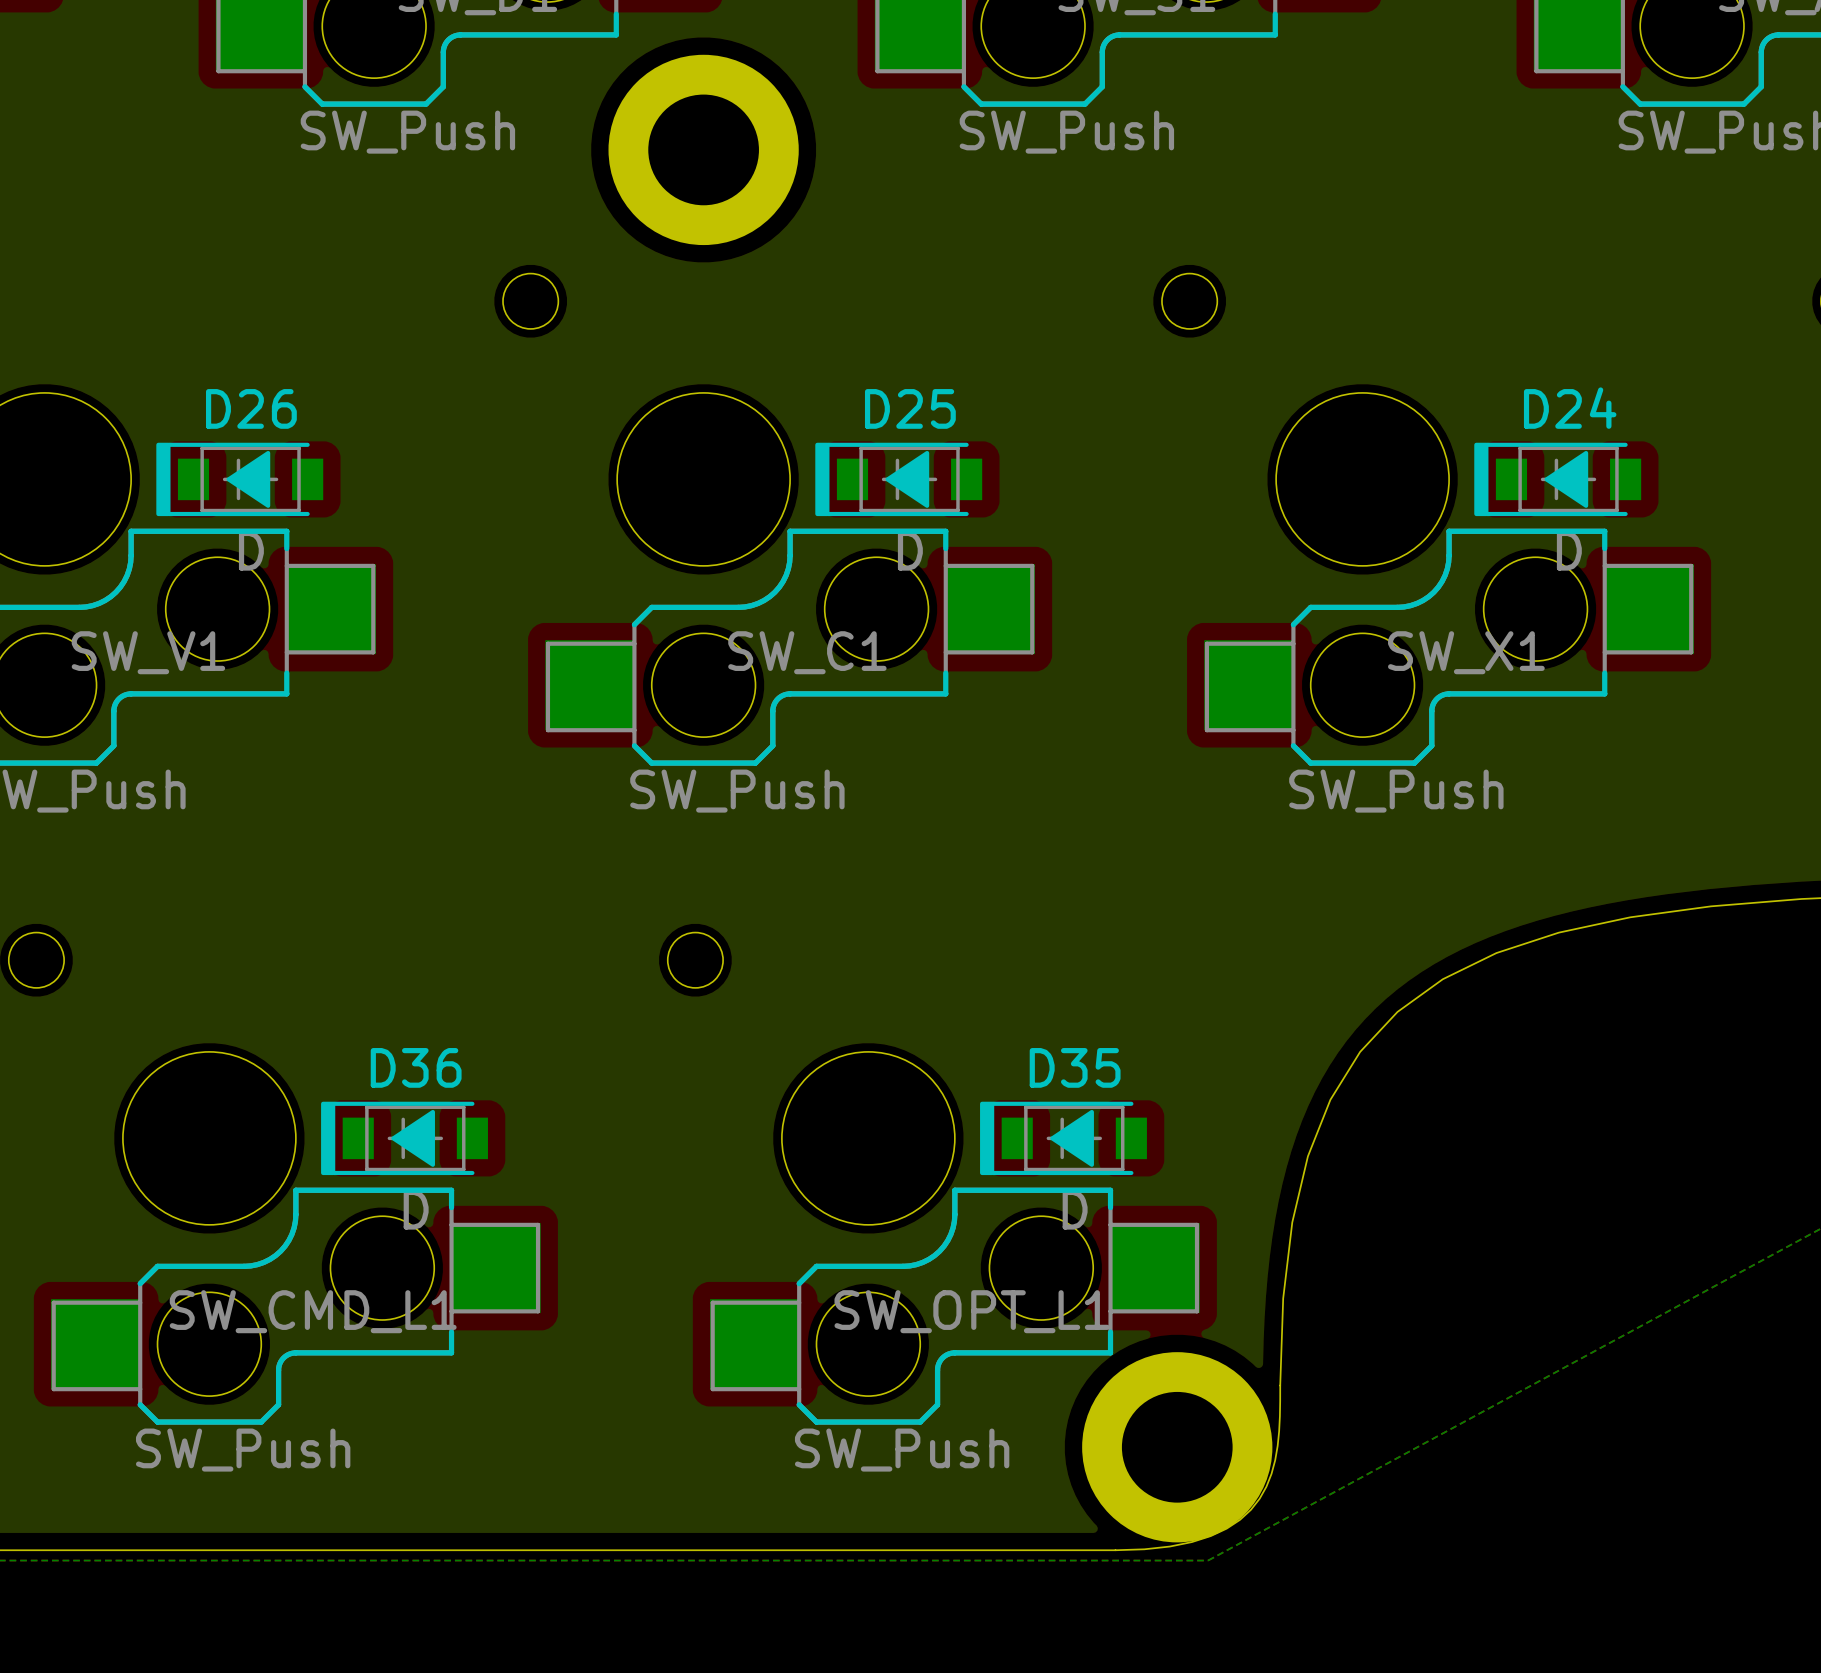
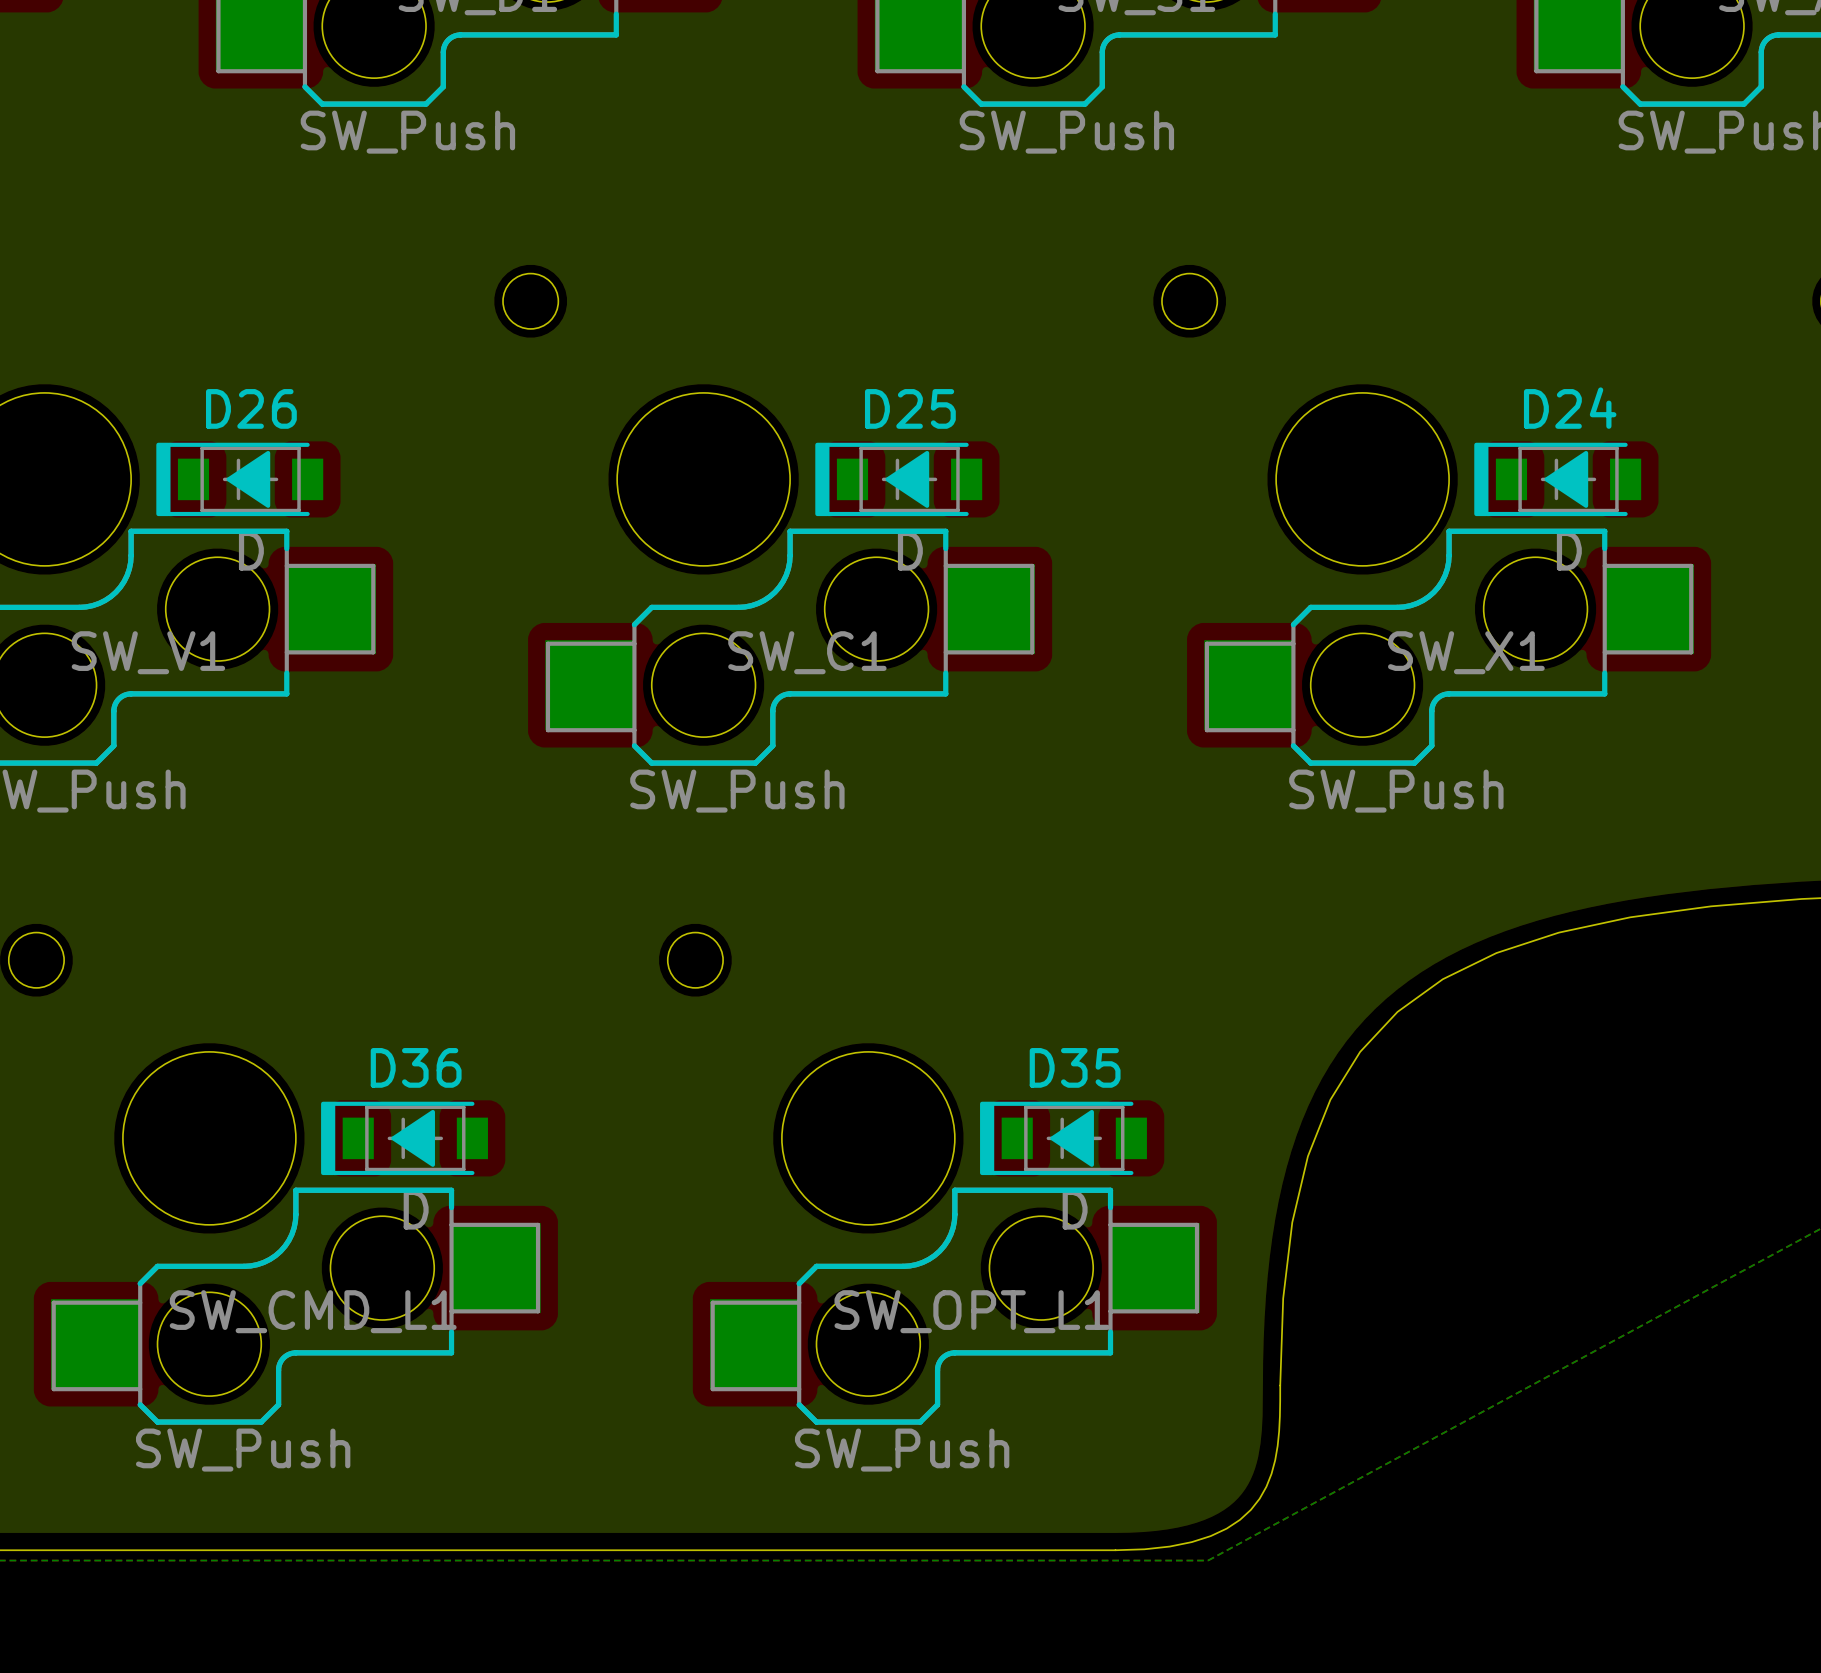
part: (703, 149) -> none
part: (1177, 1447) -> none

